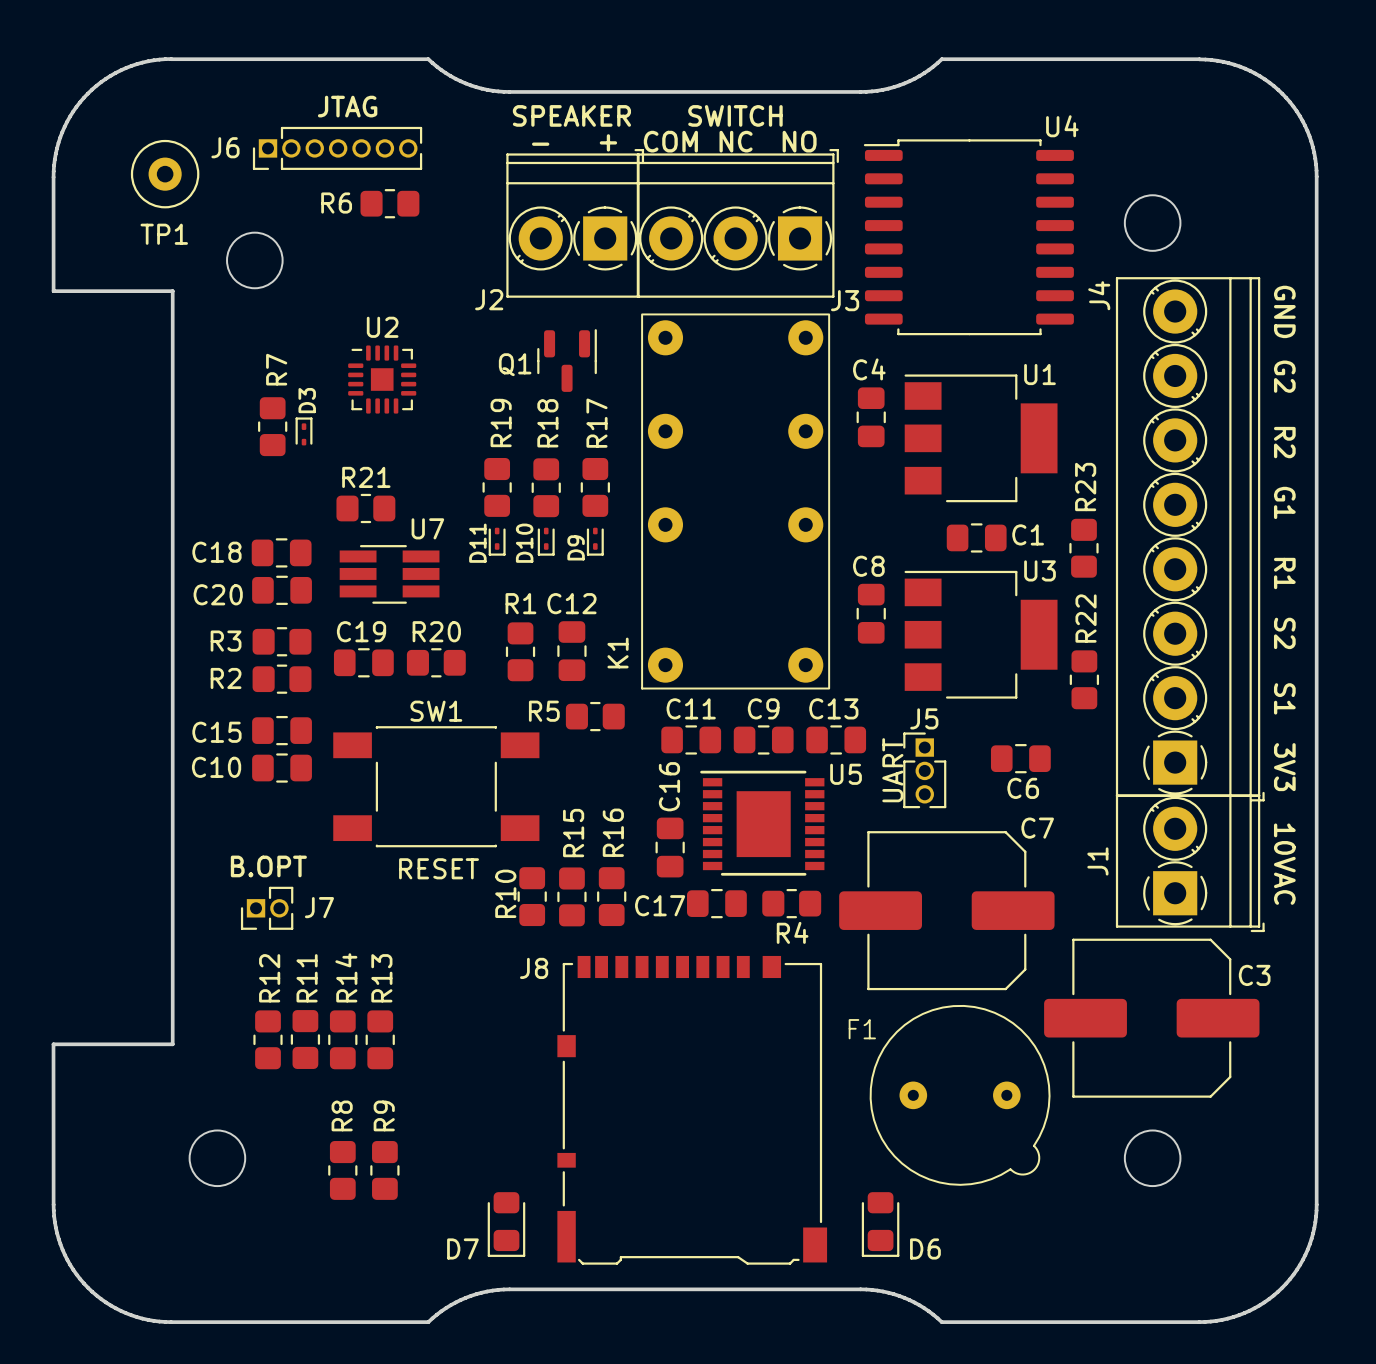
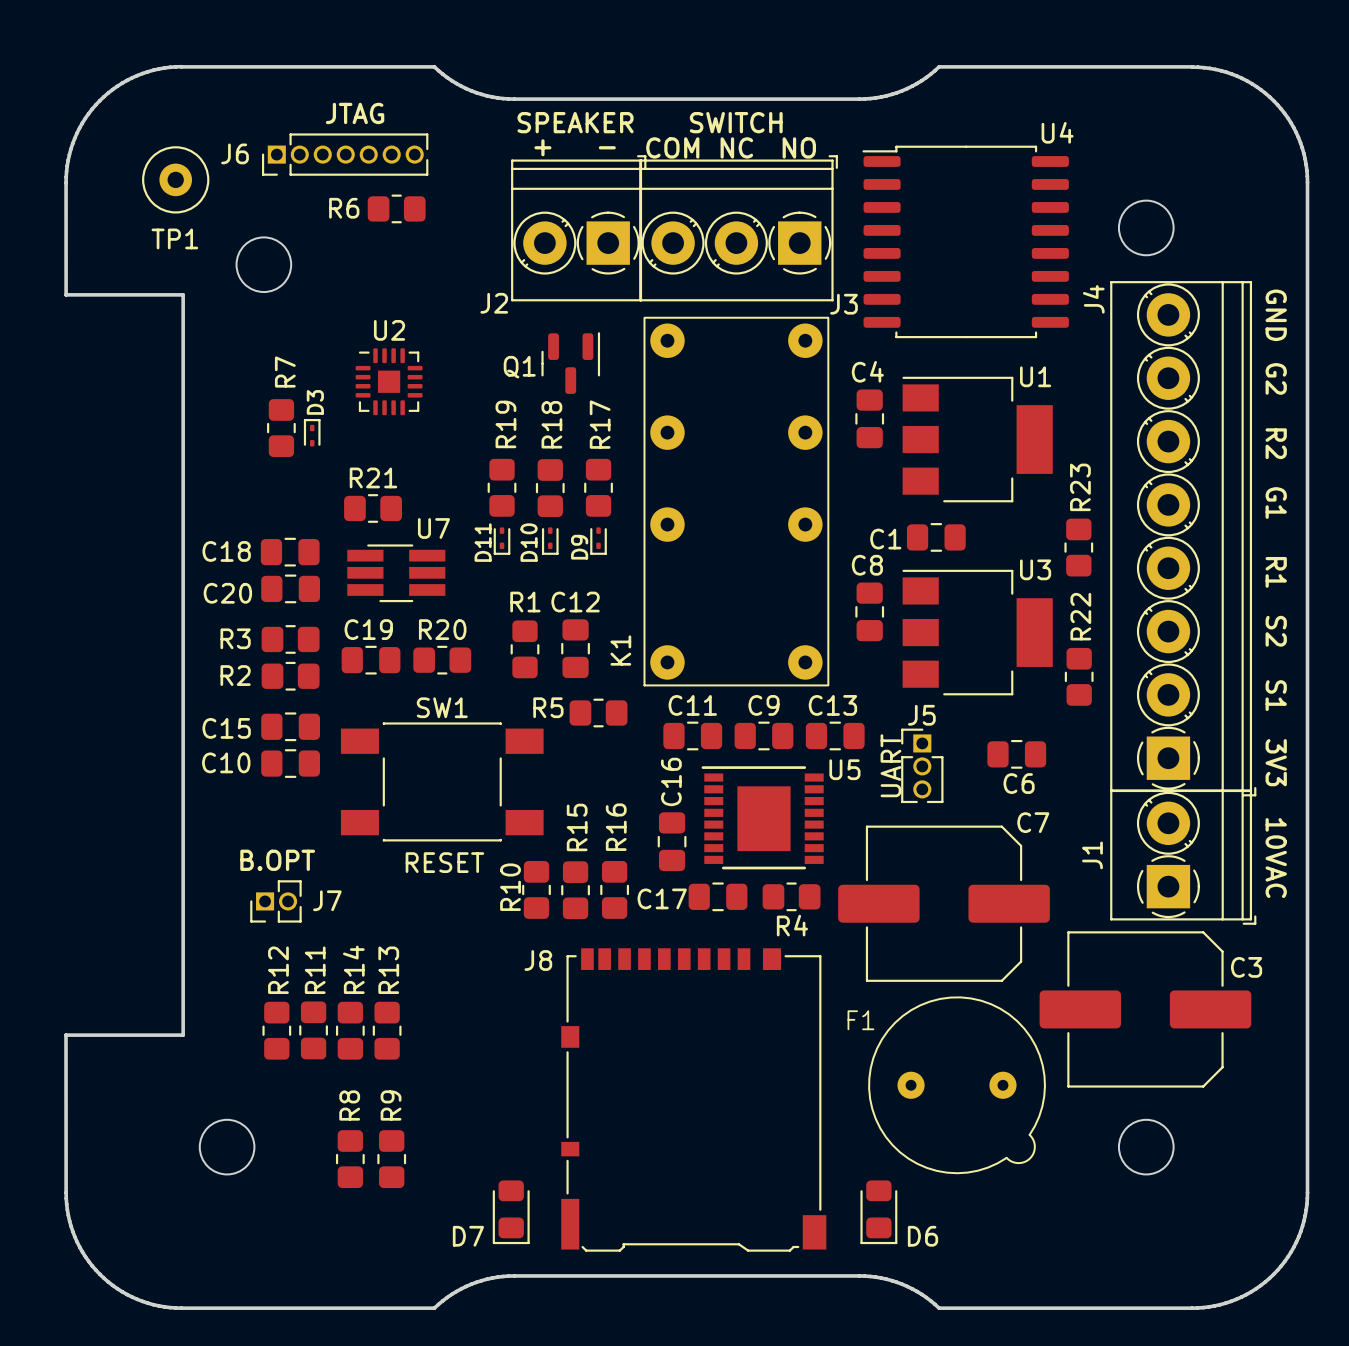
text: + (608, 142) -> - (607, 147)
text: - (540, 144) -> + (542, 147)
C1 name position: C1 (1028, 534) -> C1 (885, 539)
C1 position: (976, 537) -> (936, 537)

